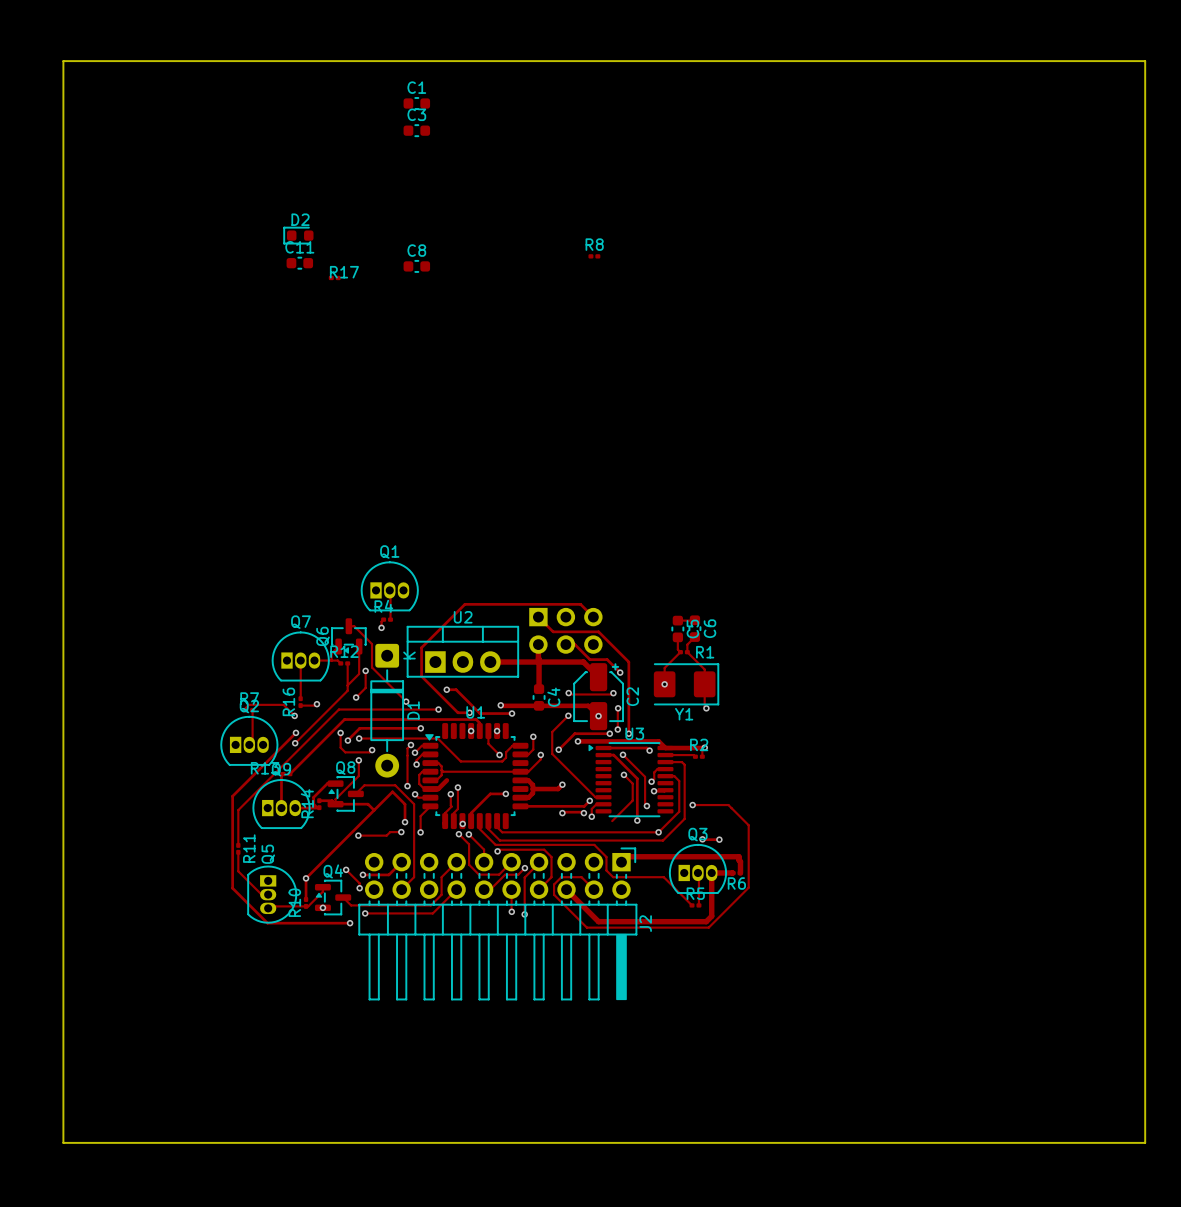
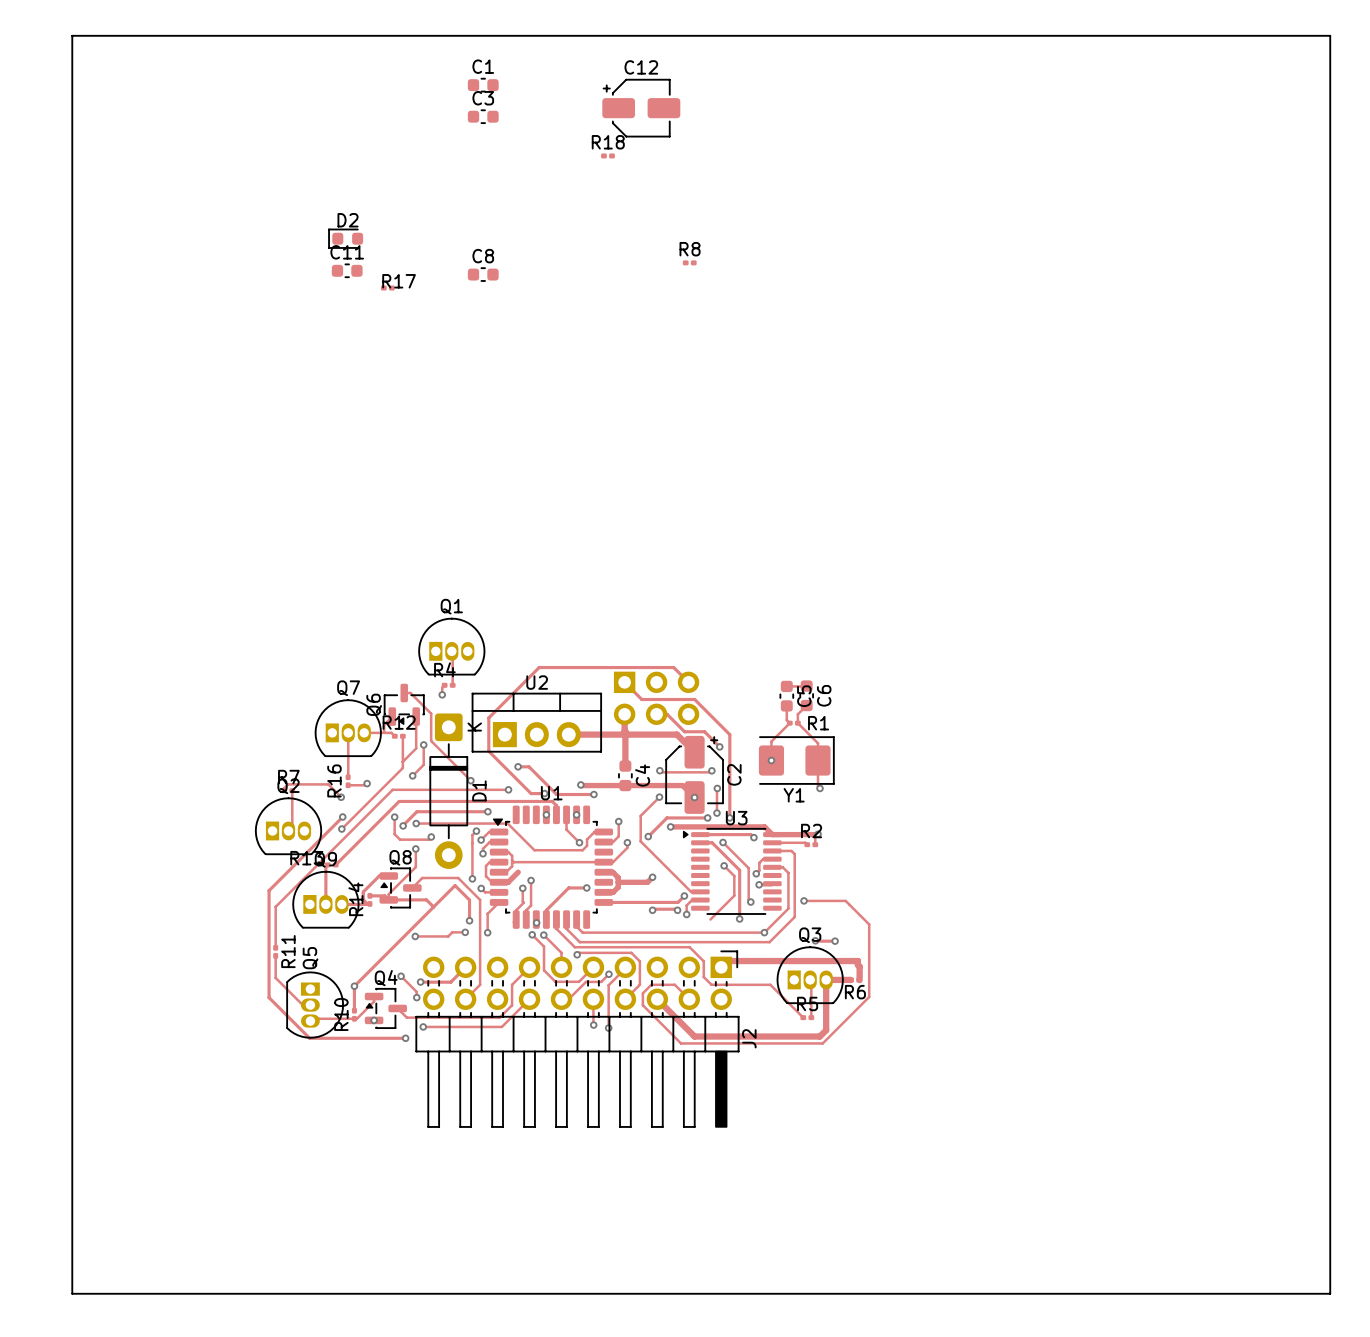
C12: none -> (641, 108)
R18: none -> (607, 155)

